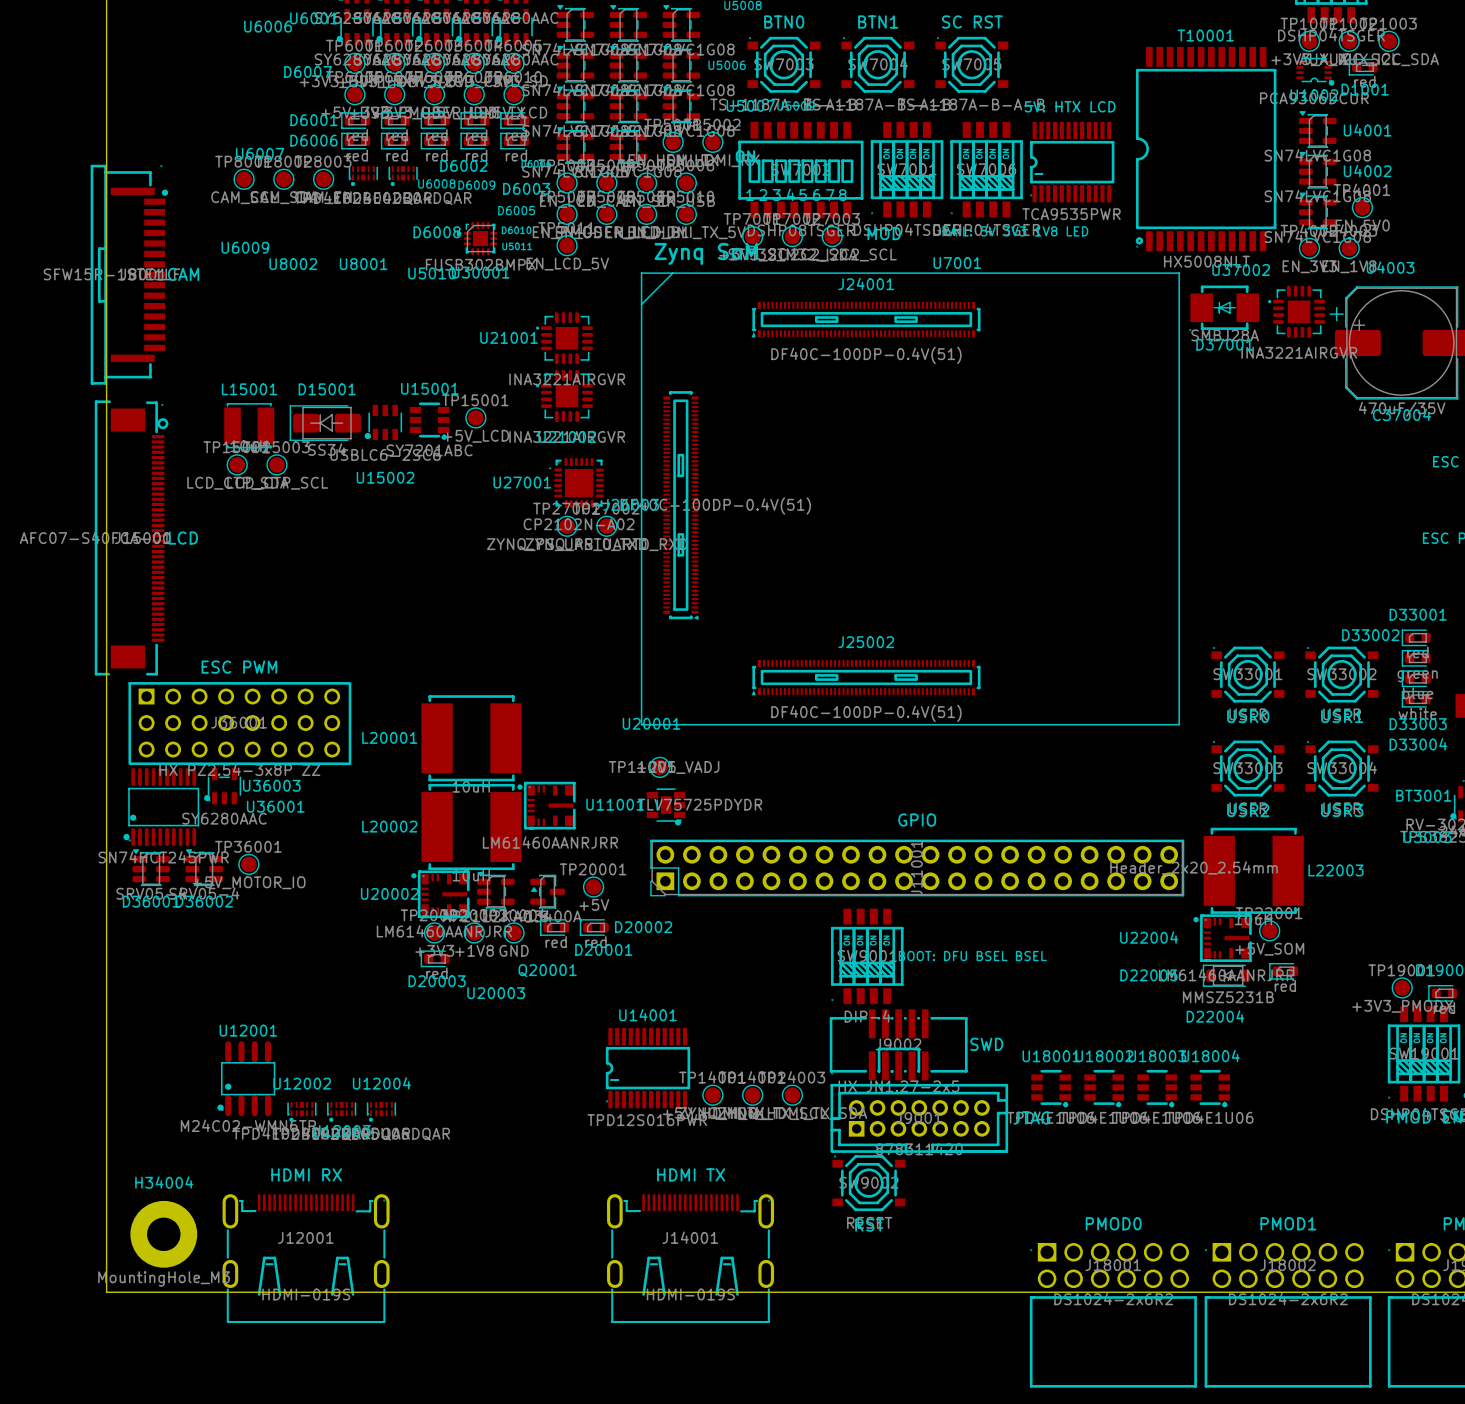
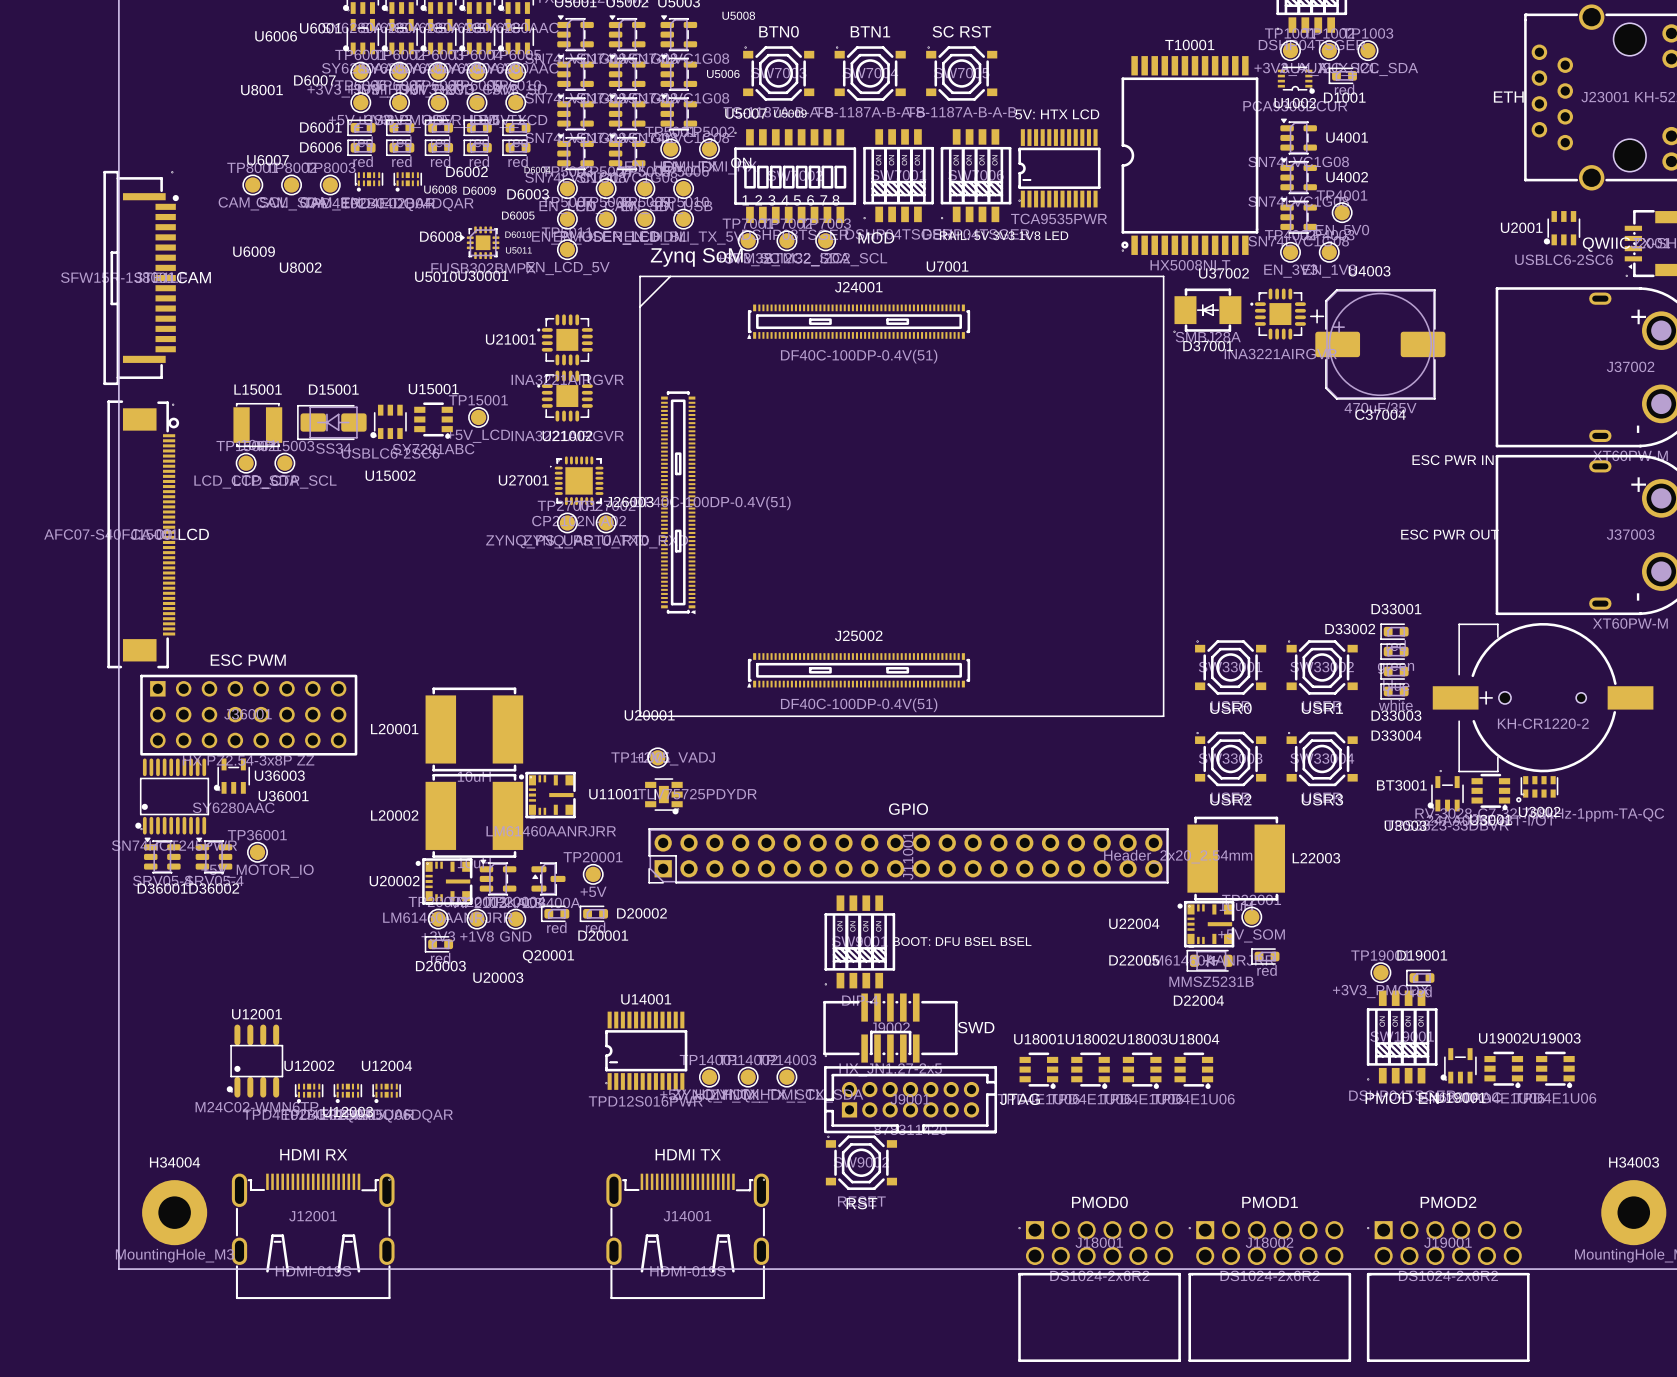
U8001 name position: U8001 (363, 264) -> U8001 (261, 90)

